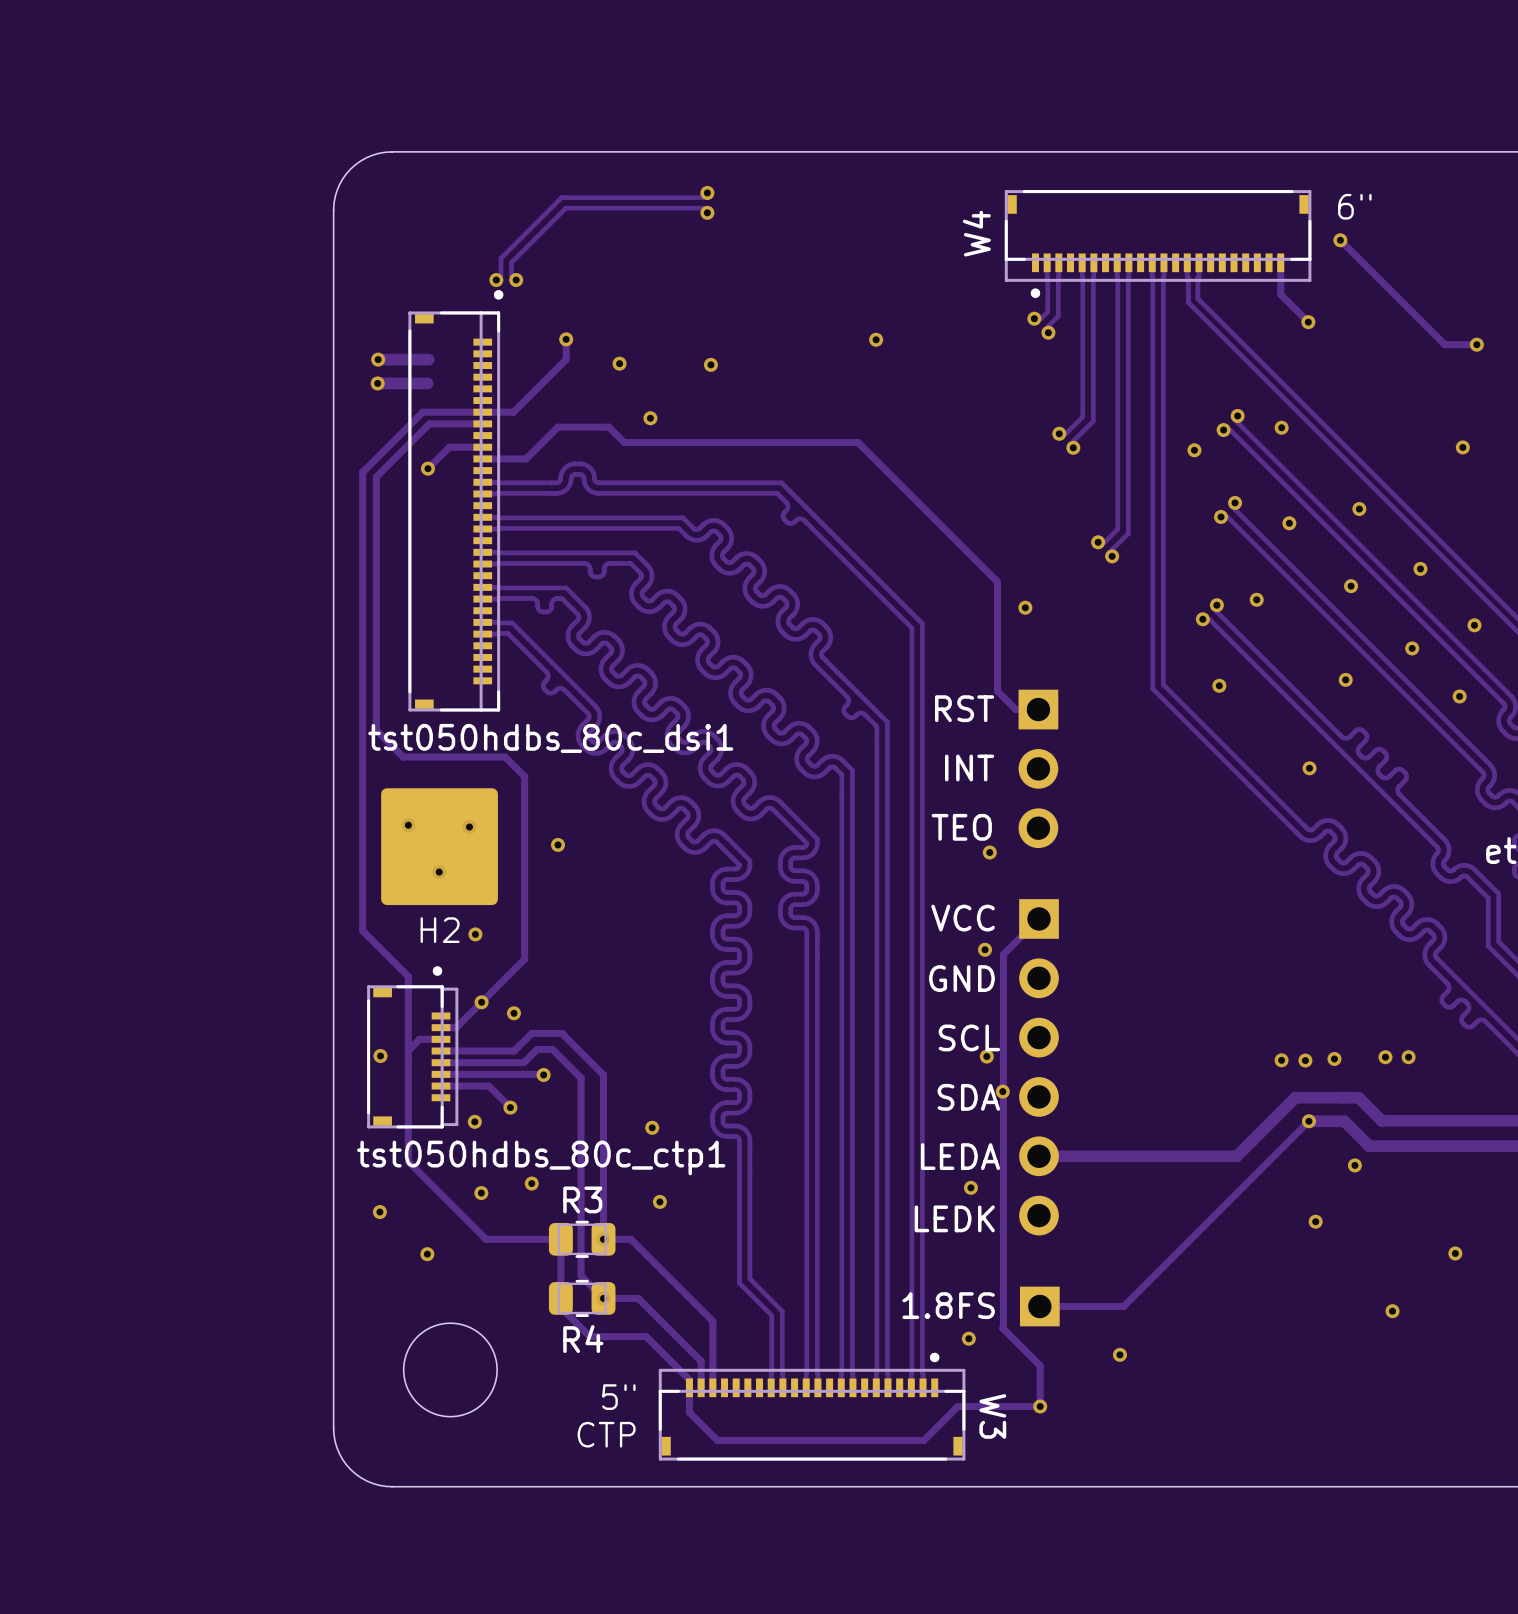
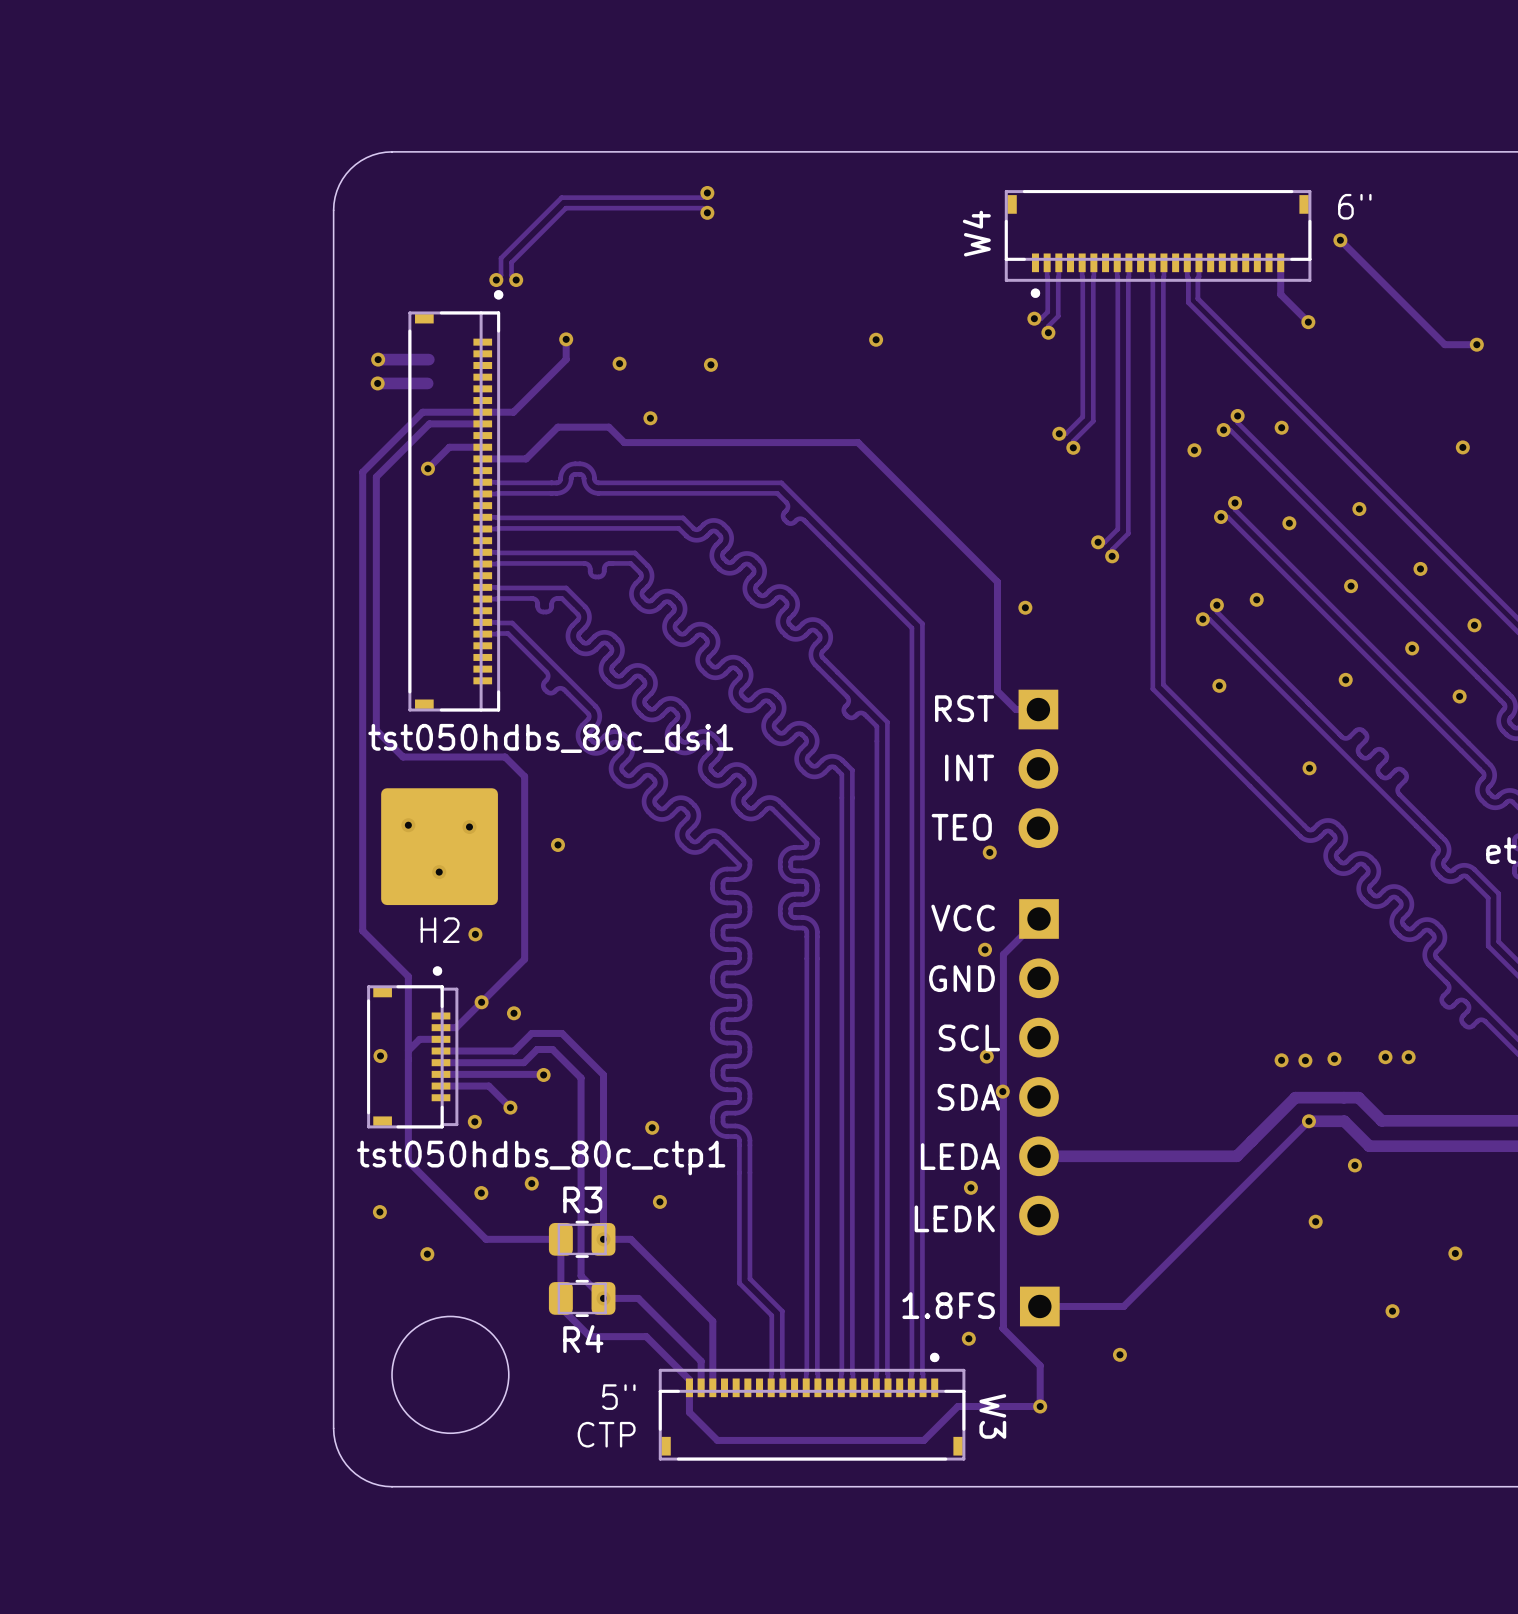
round board edge size: [403, 1322, 498, 1418] -> [391, 1315, 510, 1434]

